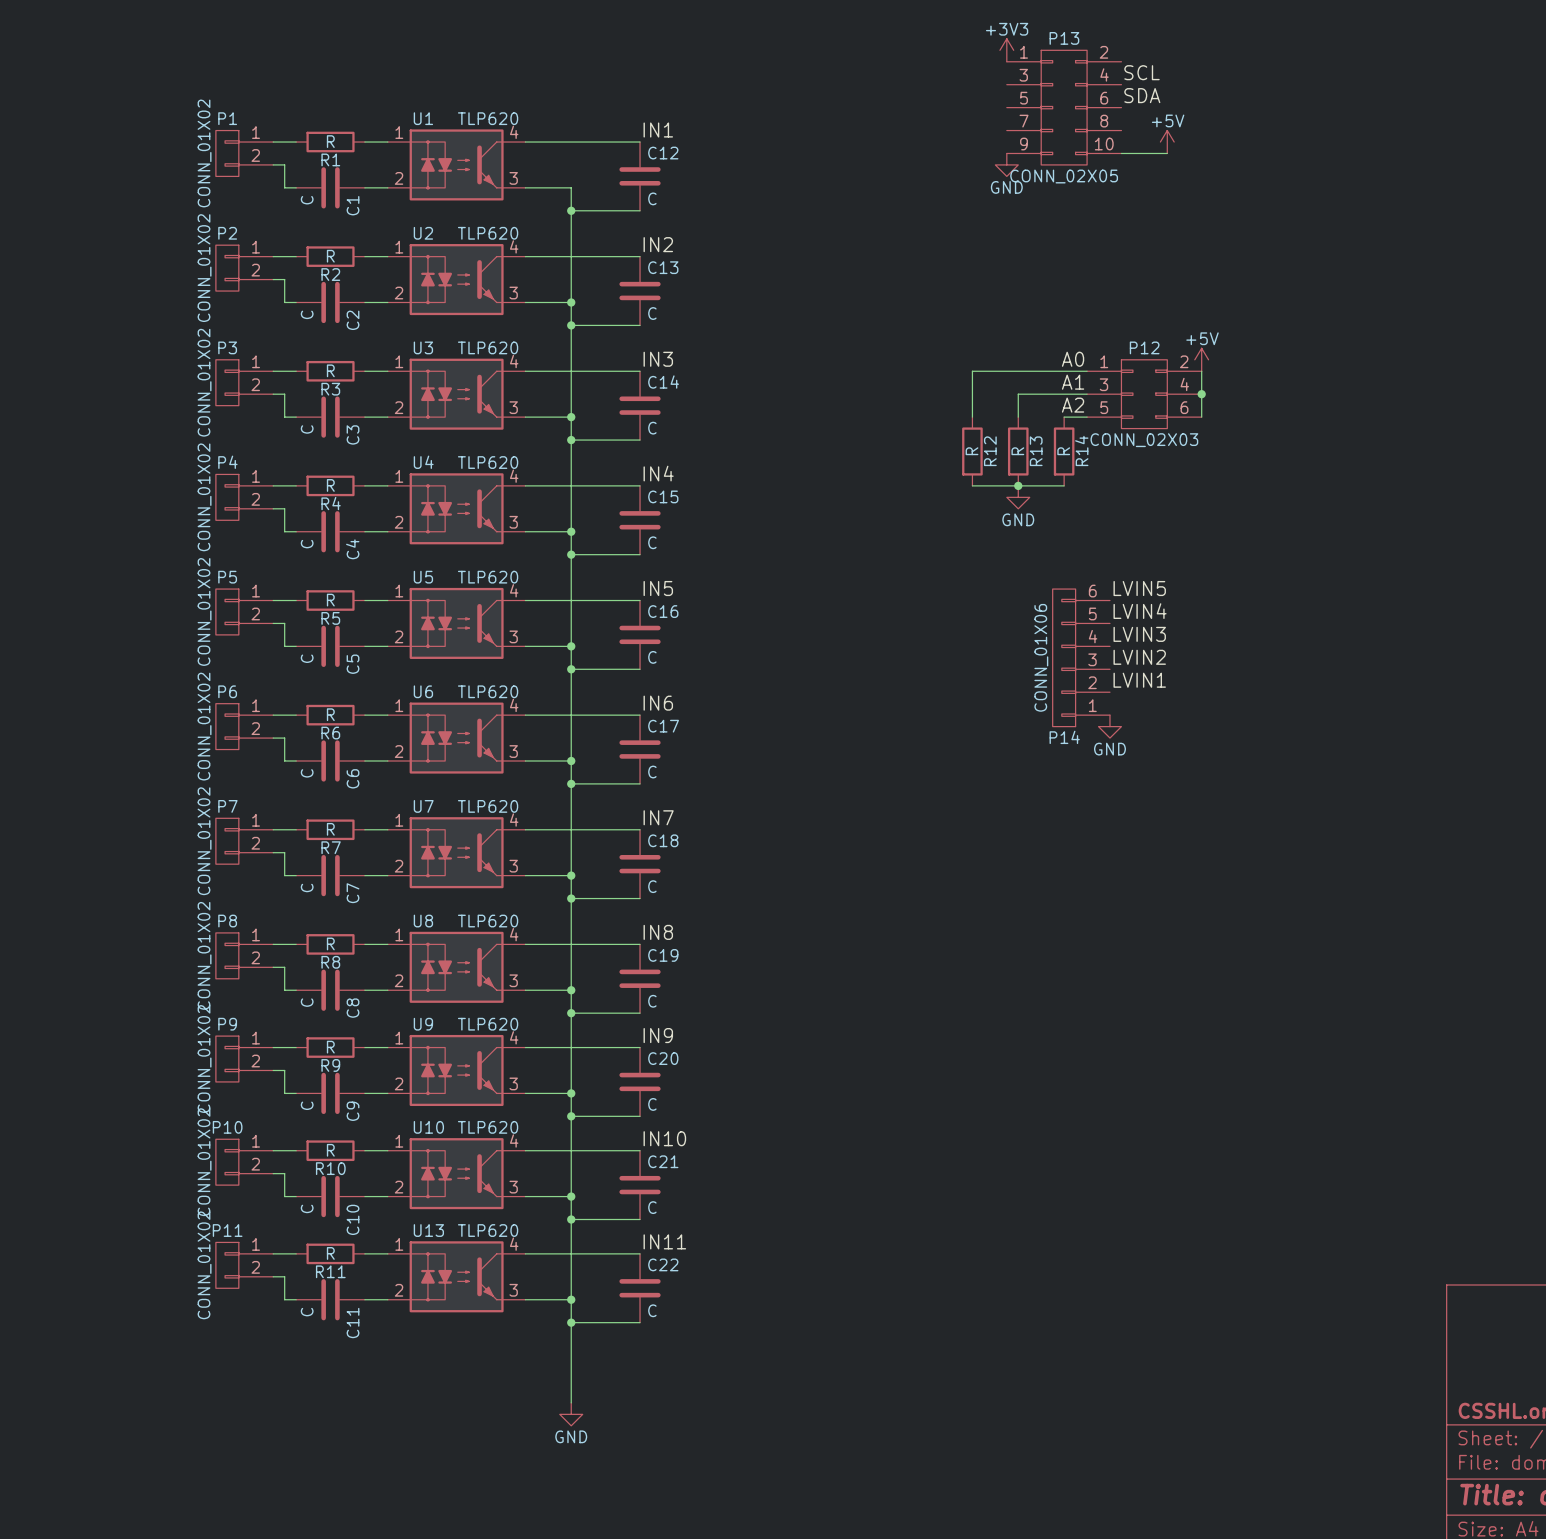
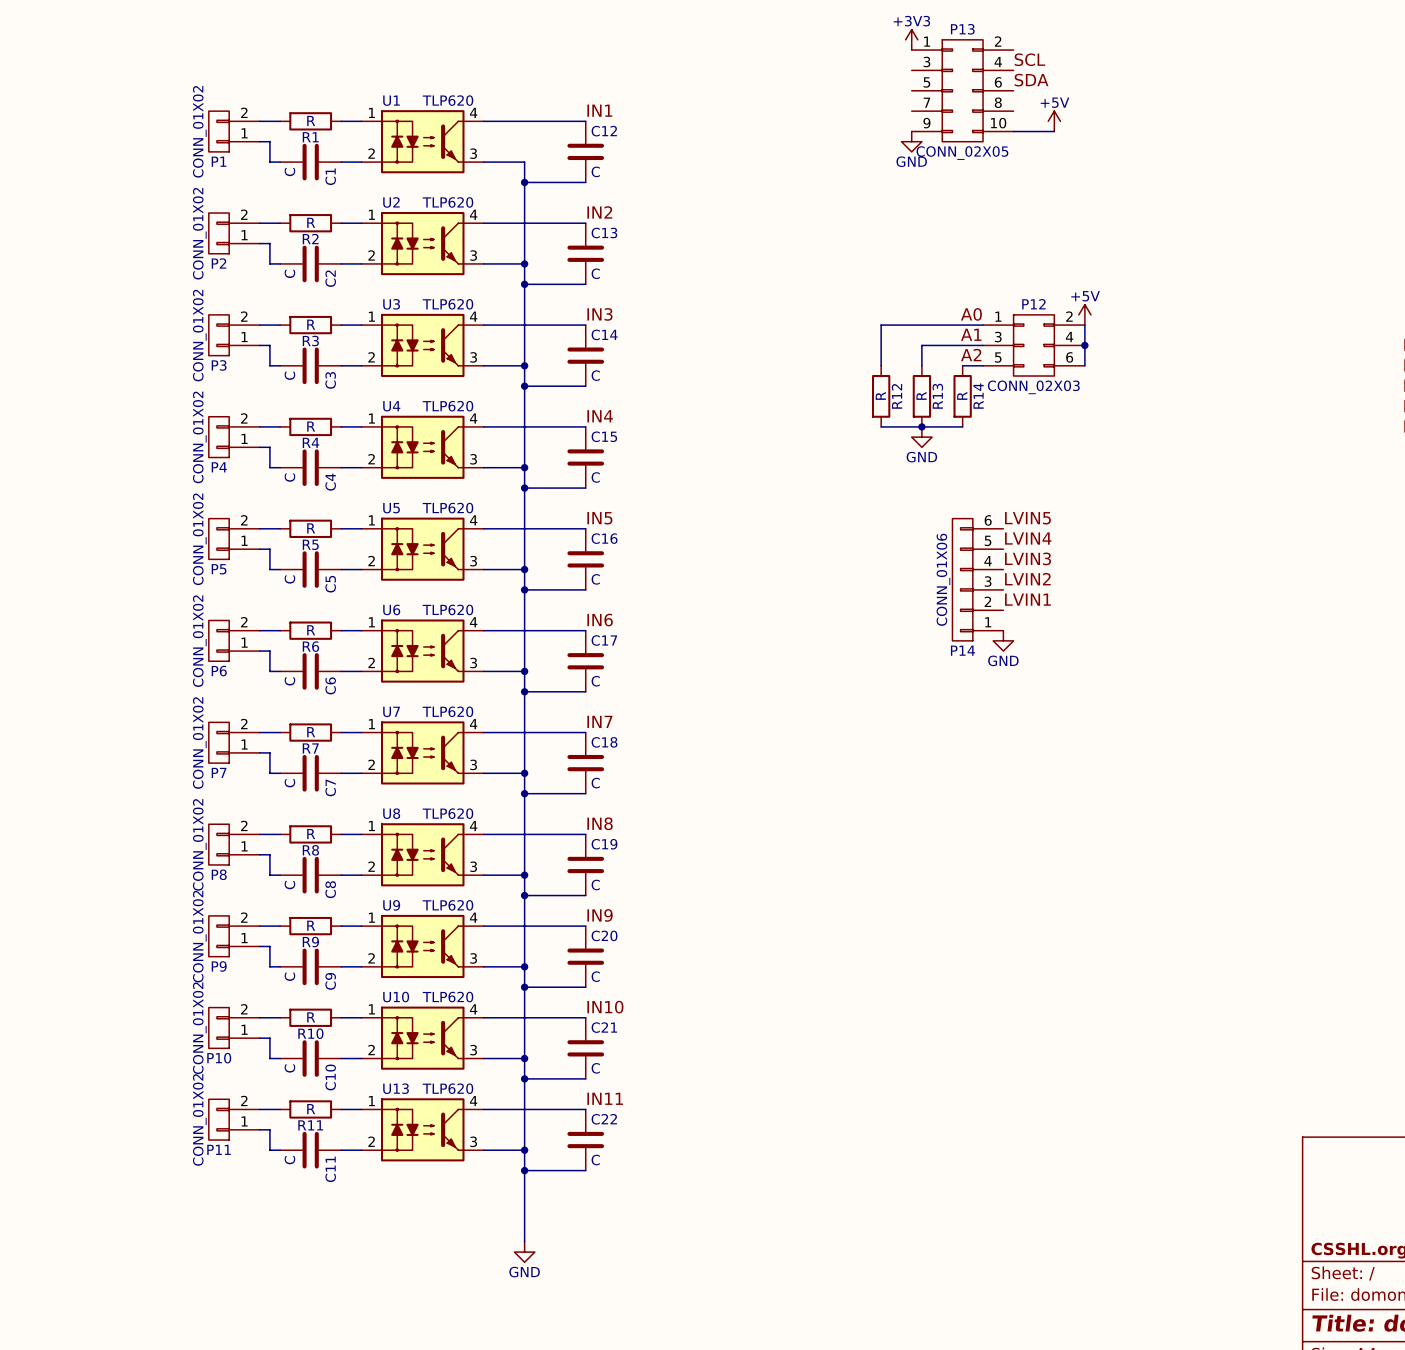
P1 flip: as is (227, 153) -> up-down (219, 131)
P2 flip: as is (227, 268) -> up-down (219, 233)
P3 flip: as is (227, 382) -> up-down (219, 335)
P4 flip: as is (227, 497) -> up-down (219, 437)
P5 flip: as is (227, 611) -> up-down (219, 539)
P6 flip: as is (227, 726) -> up-down (219, 640)
P7 flip: as is (227, 841) -> up-down (219, 742)
P8 flip: as is (227, 955) -> up-down (219, 844)
P9 flip: as is (227, 1059) -> up-down (219, 936)
P10 flip: as is (227, 1162) -> up-down (219, 1027)
P11 flip: as is (227, 1265) -> up-down (219, 1119)

